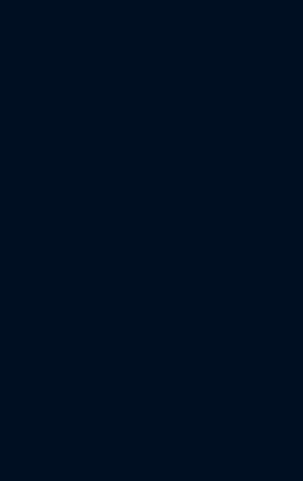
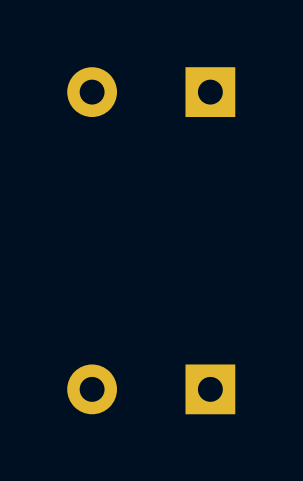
part: none -> (151, 92)
part: none -> (151, 389)

